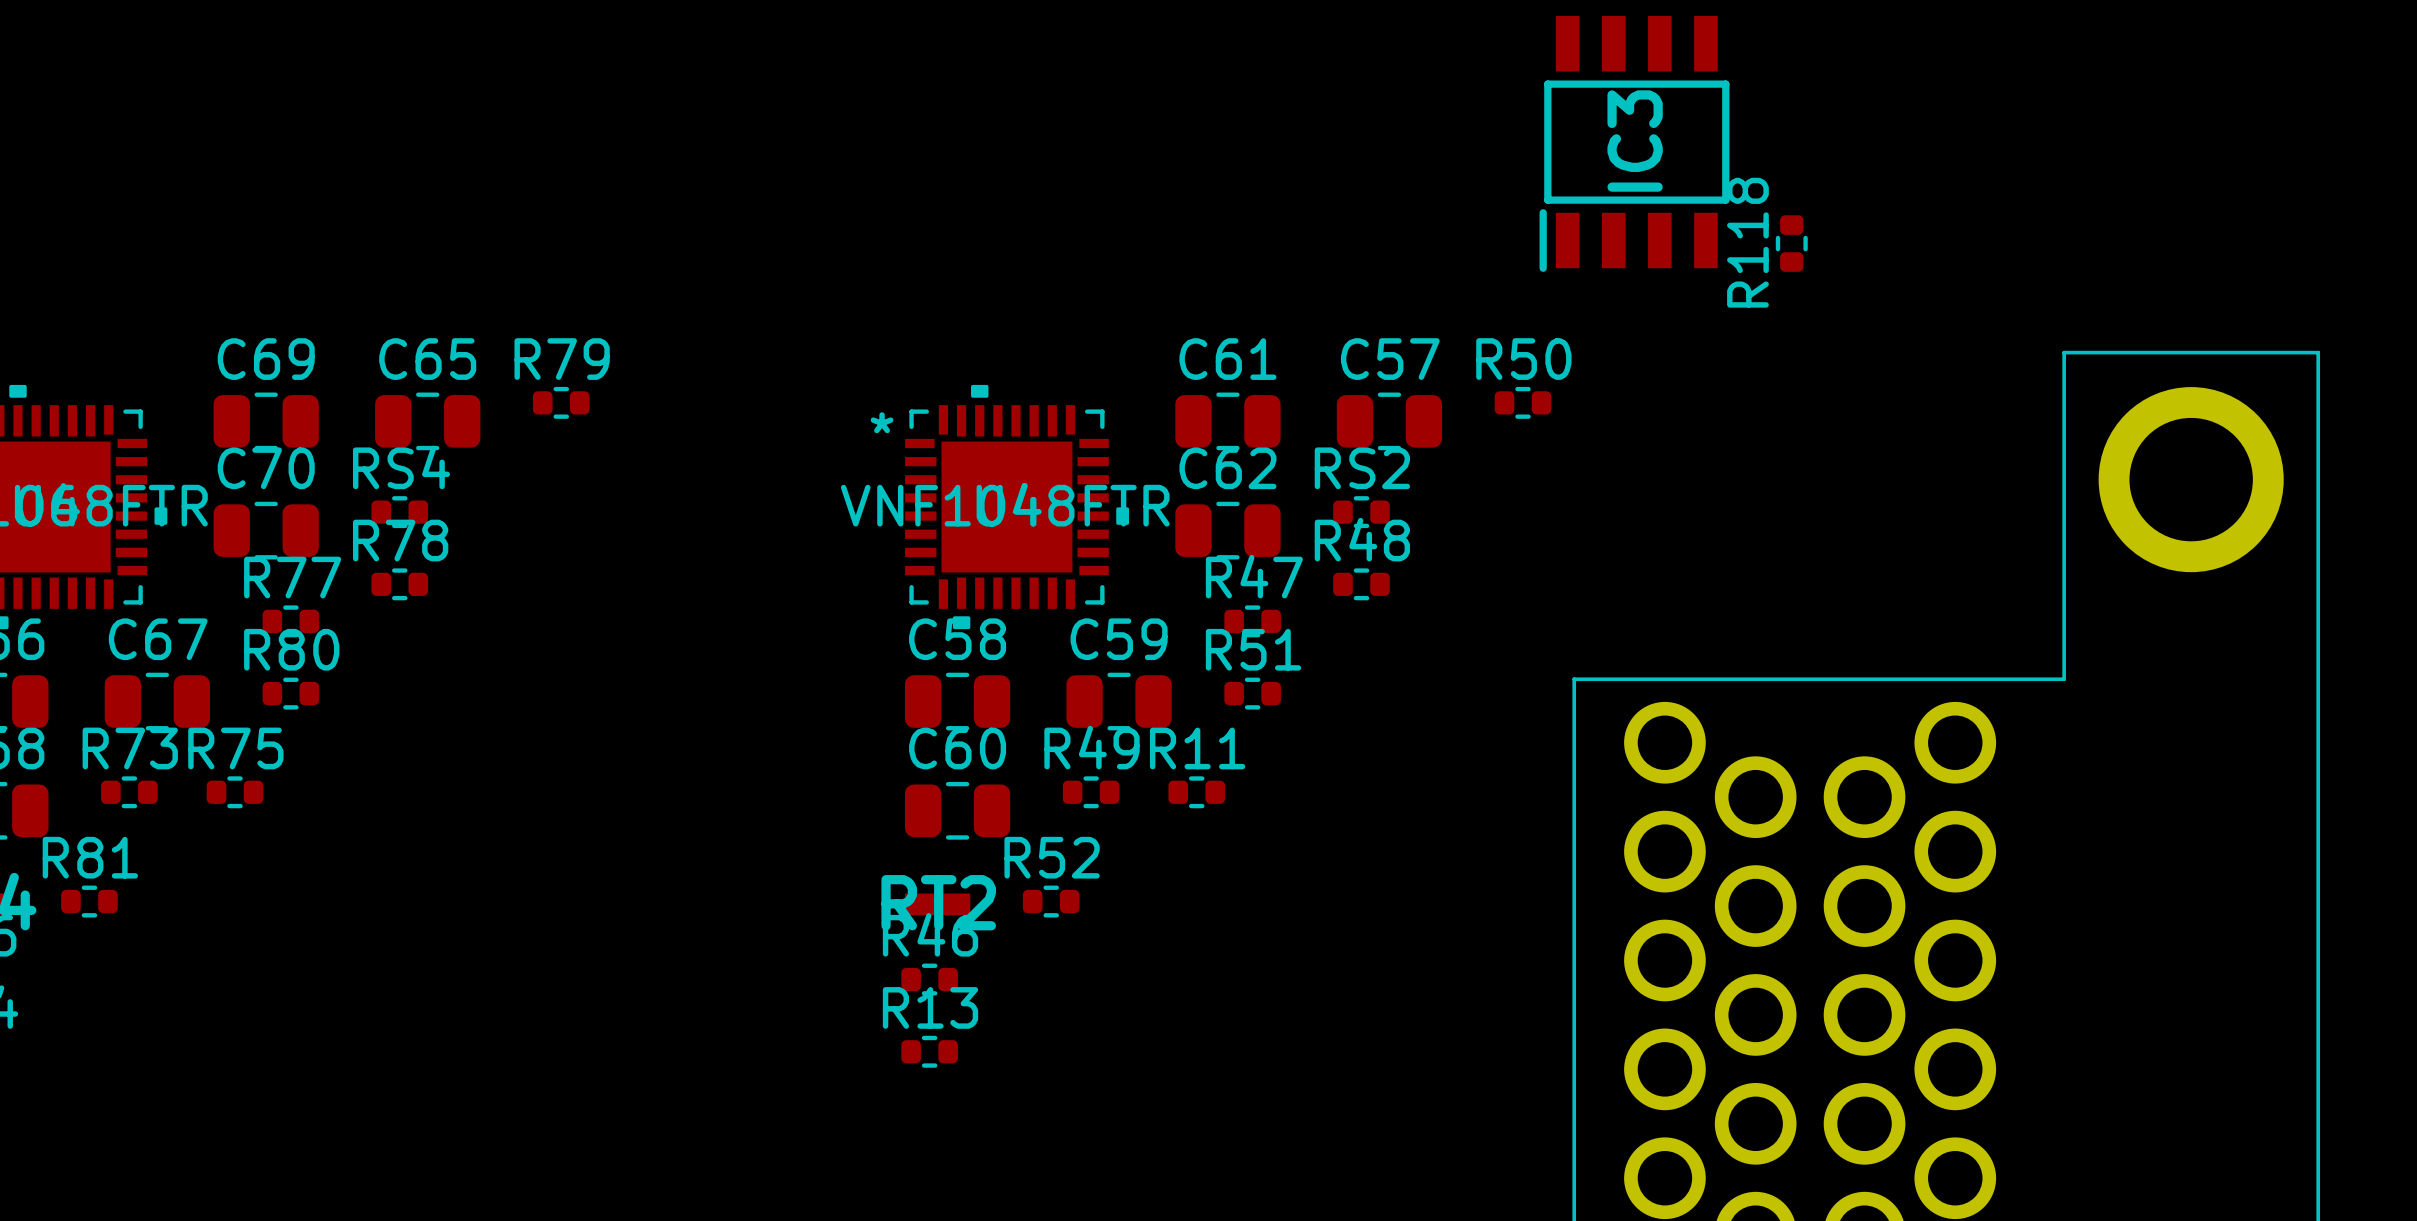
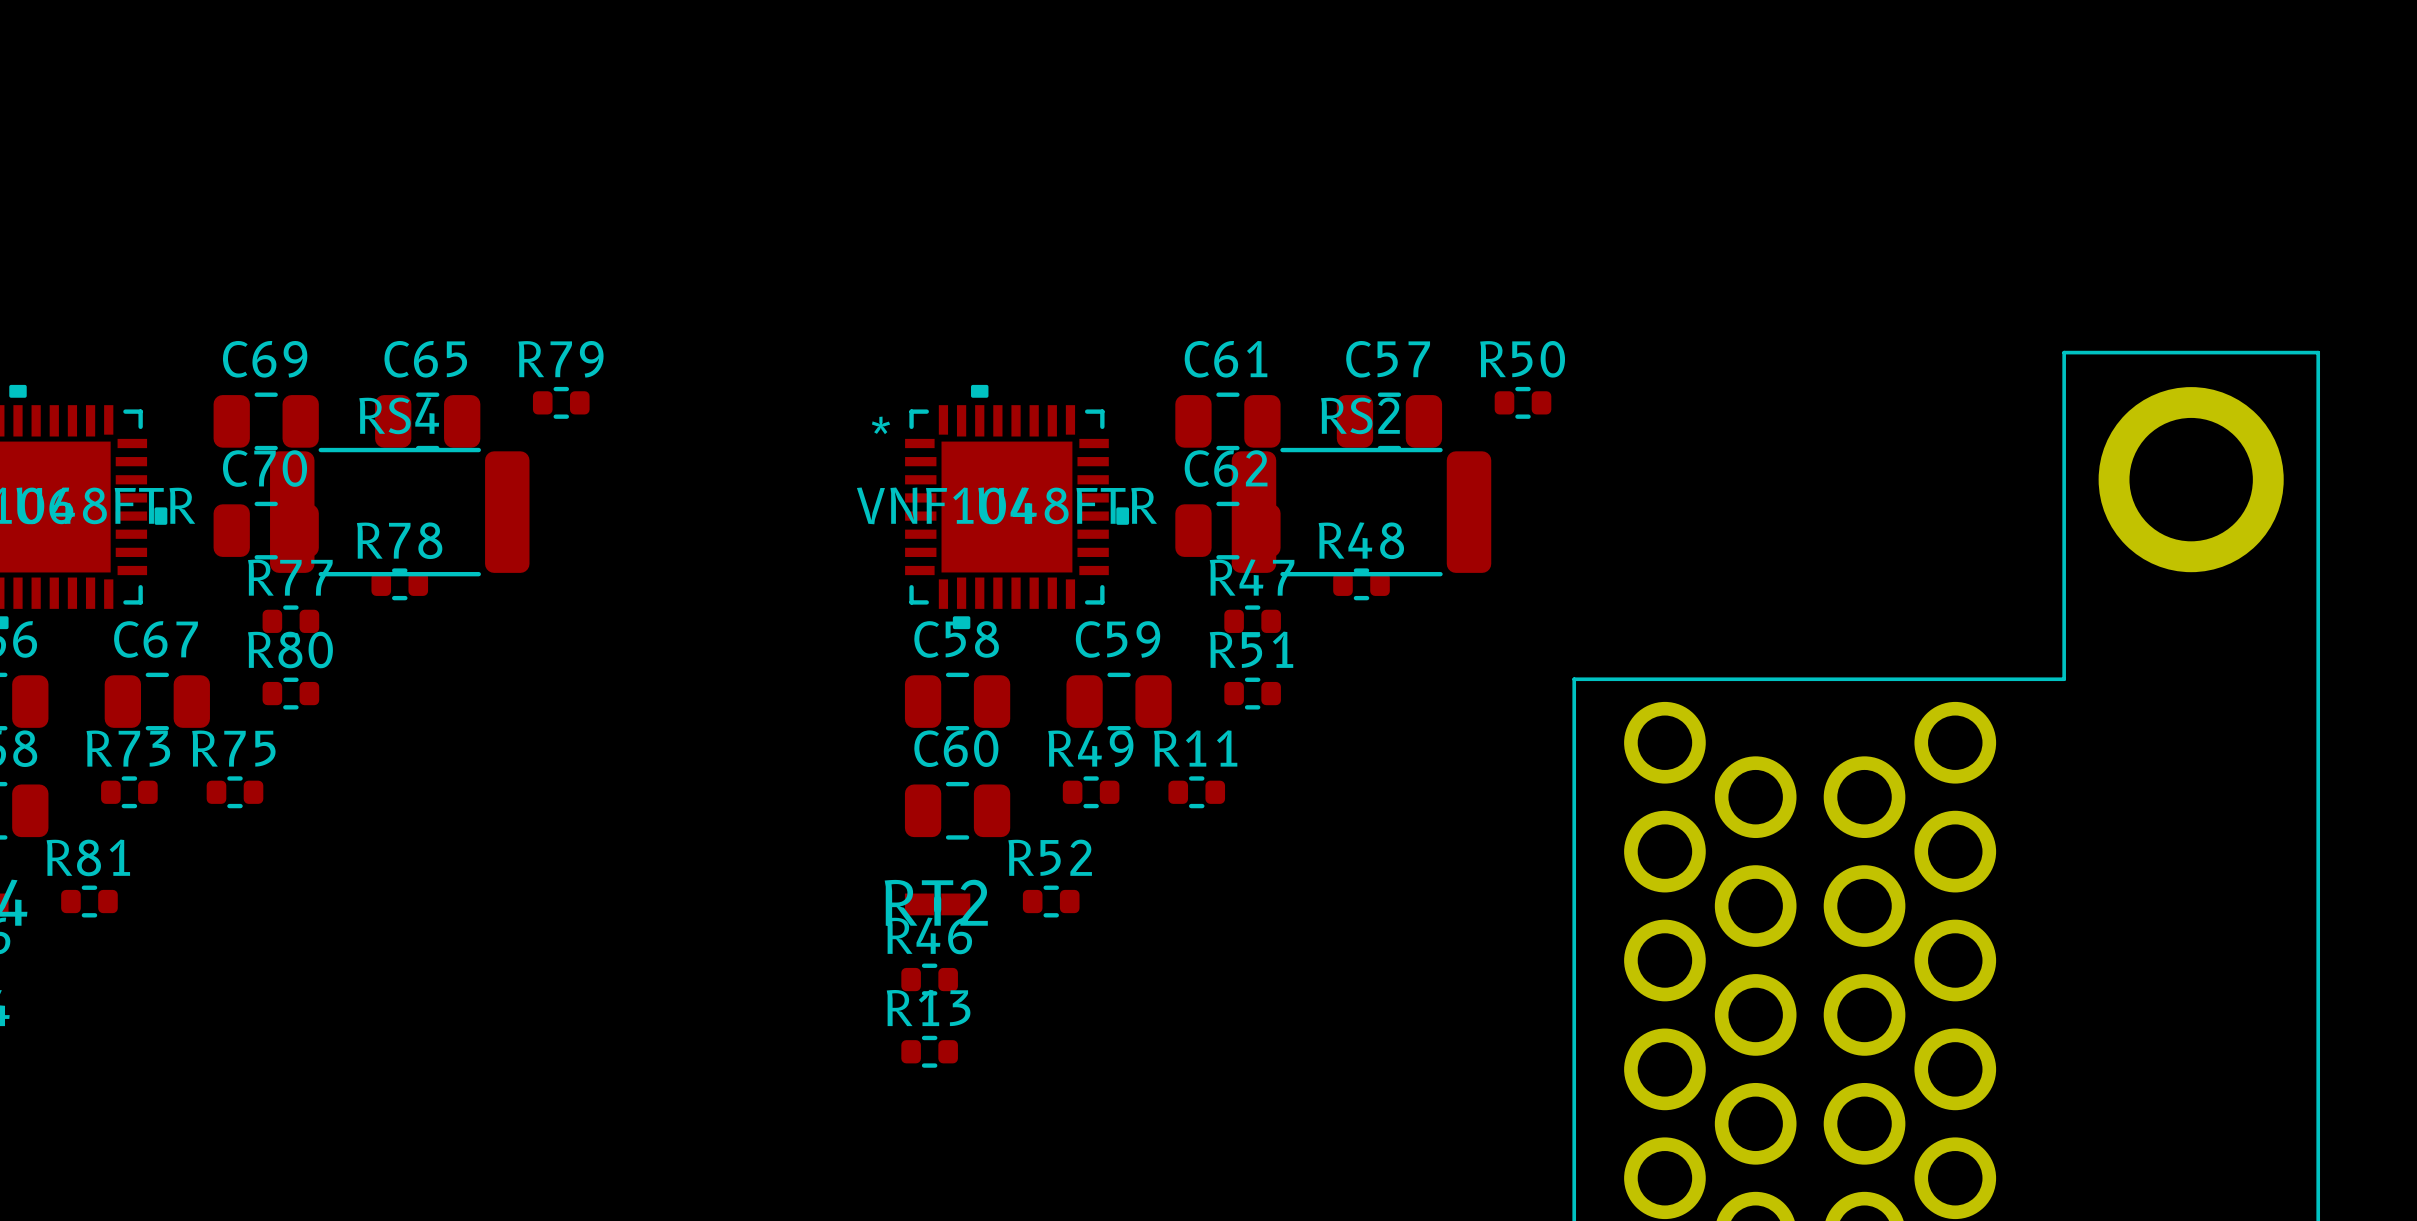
IC3: (1634, 143) -> none
R118: (1791, 243) -> none
RS4 footprint: [371, 496, 429, 529] -> [270, 447, 530, 577]
RS2 footprint: [1333, 496, 1390, 529] -> [1231, 447, 1492, 577]

